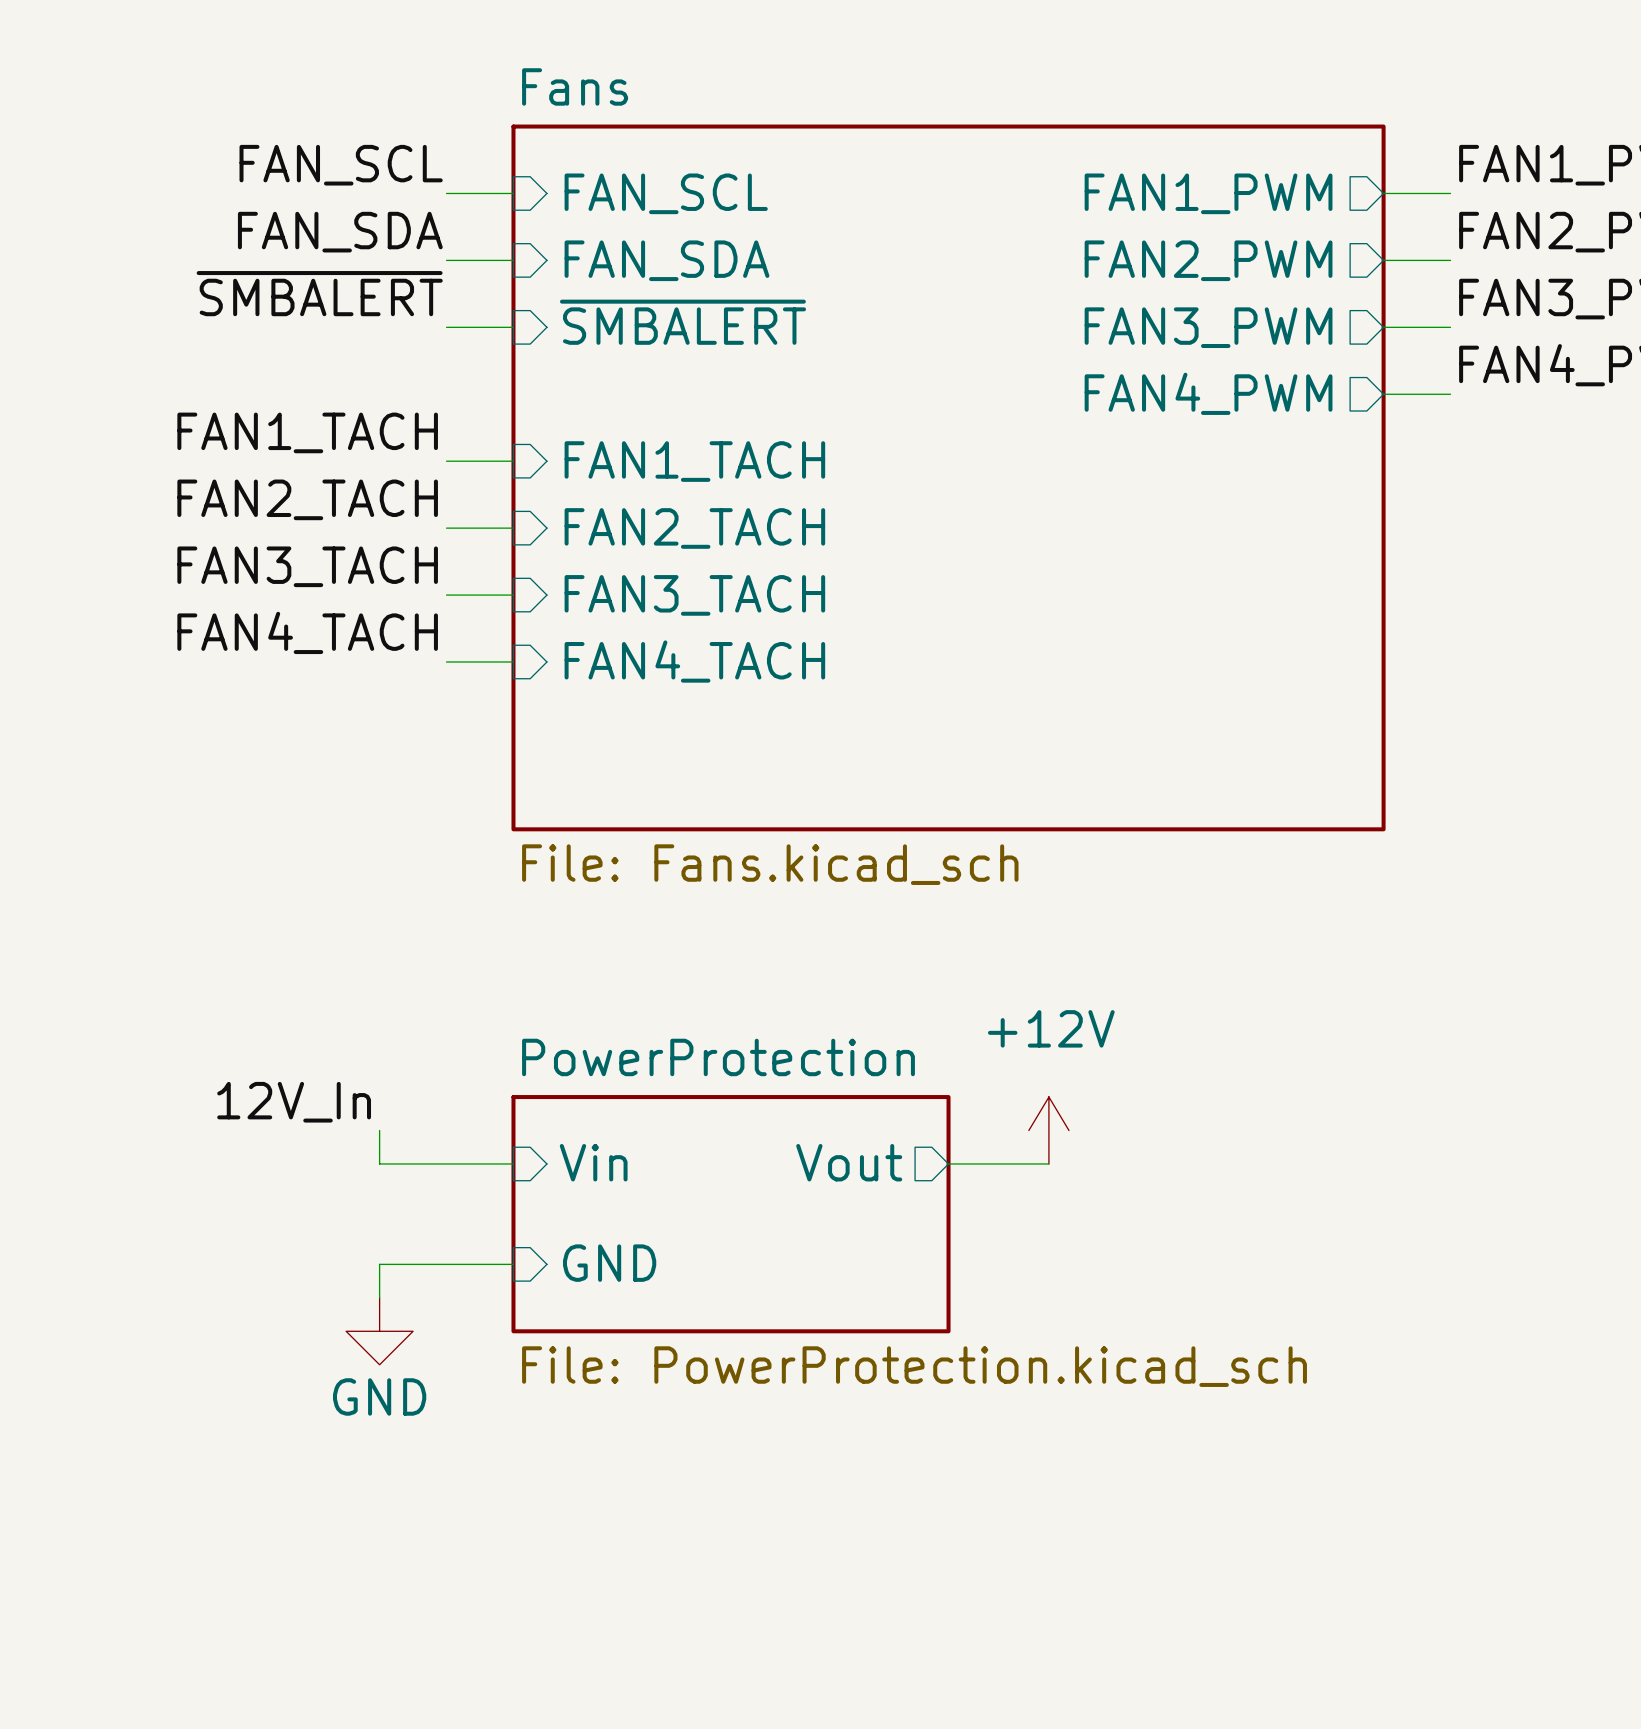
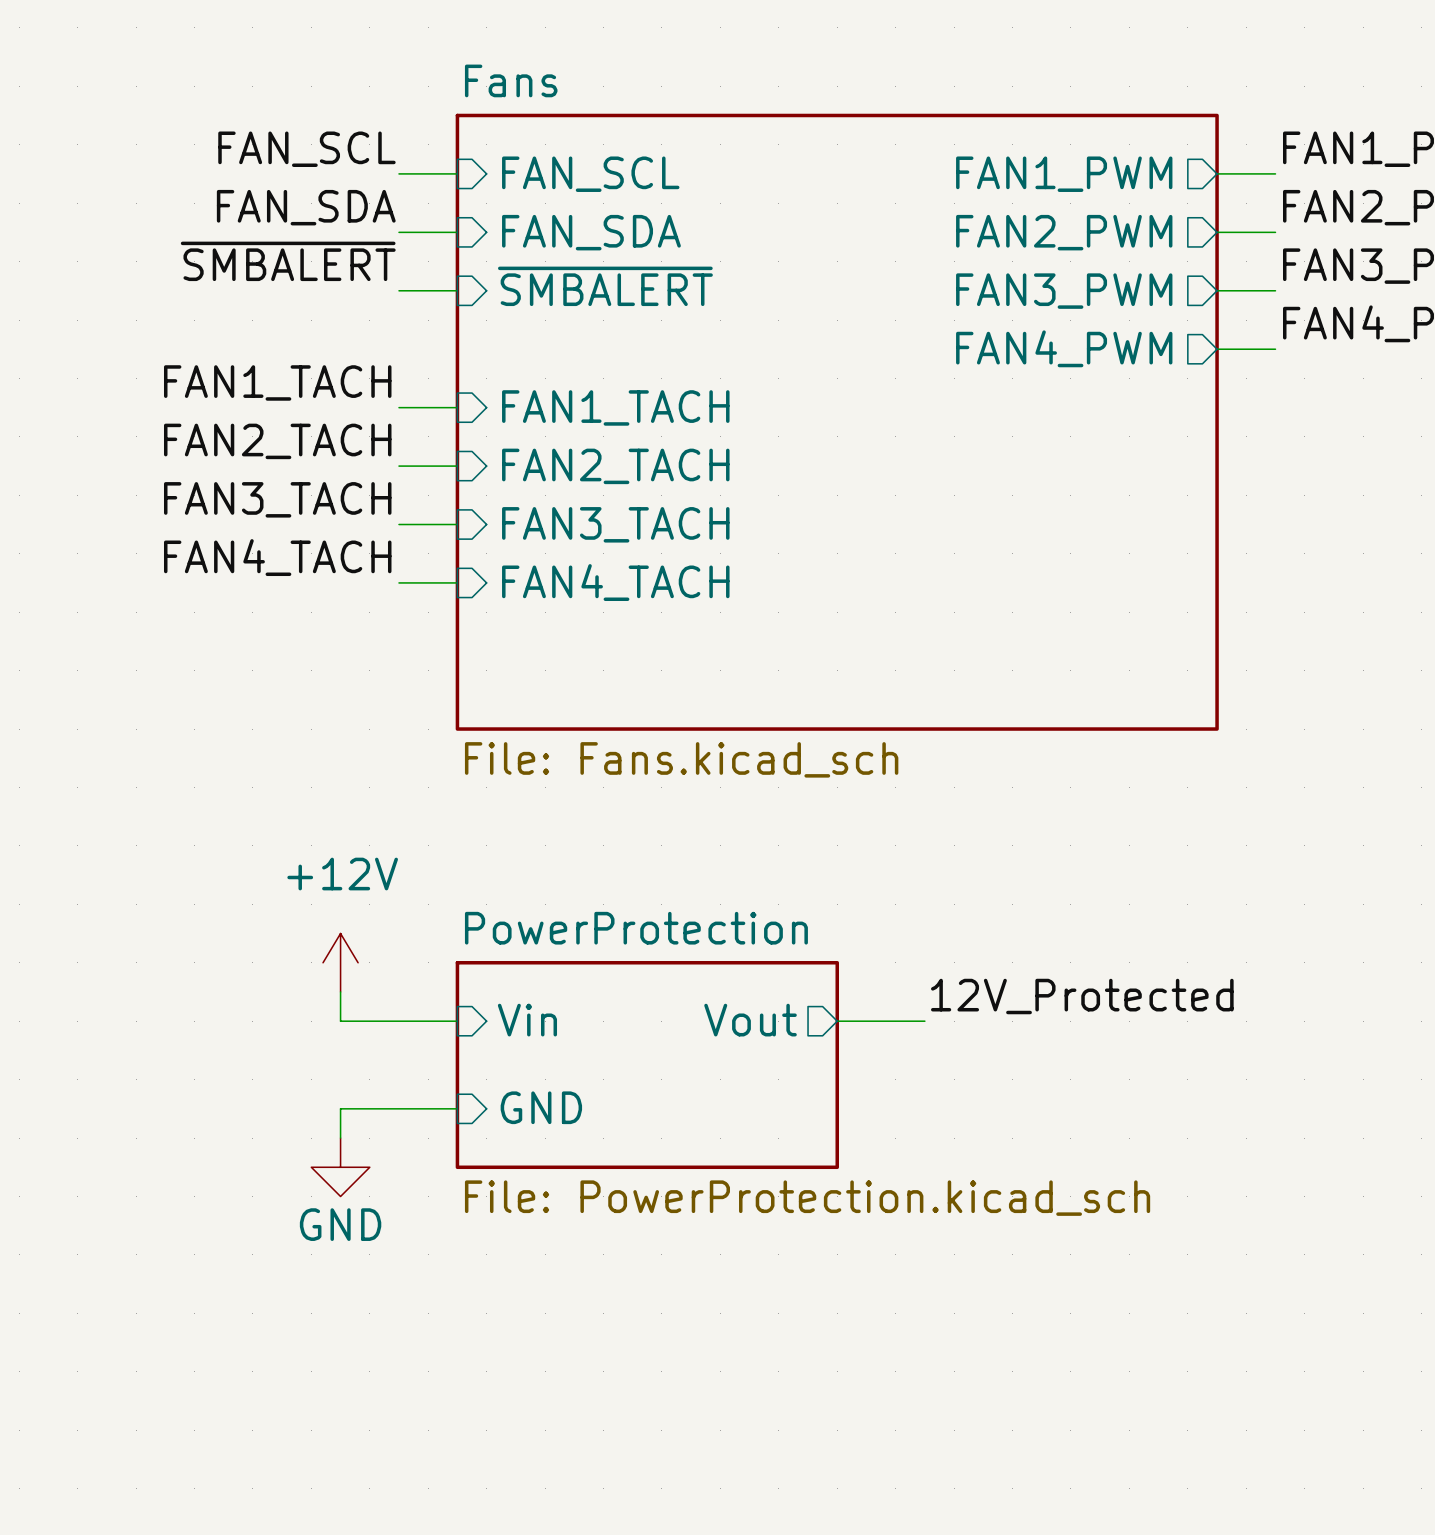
power symbol: none -> +12V (340, 962)
label: 12V_In (294, 1102) -> none
power symbol: +12V (1048, 1130) -> none
label: none -> 12V_Protected (1082, 996)

